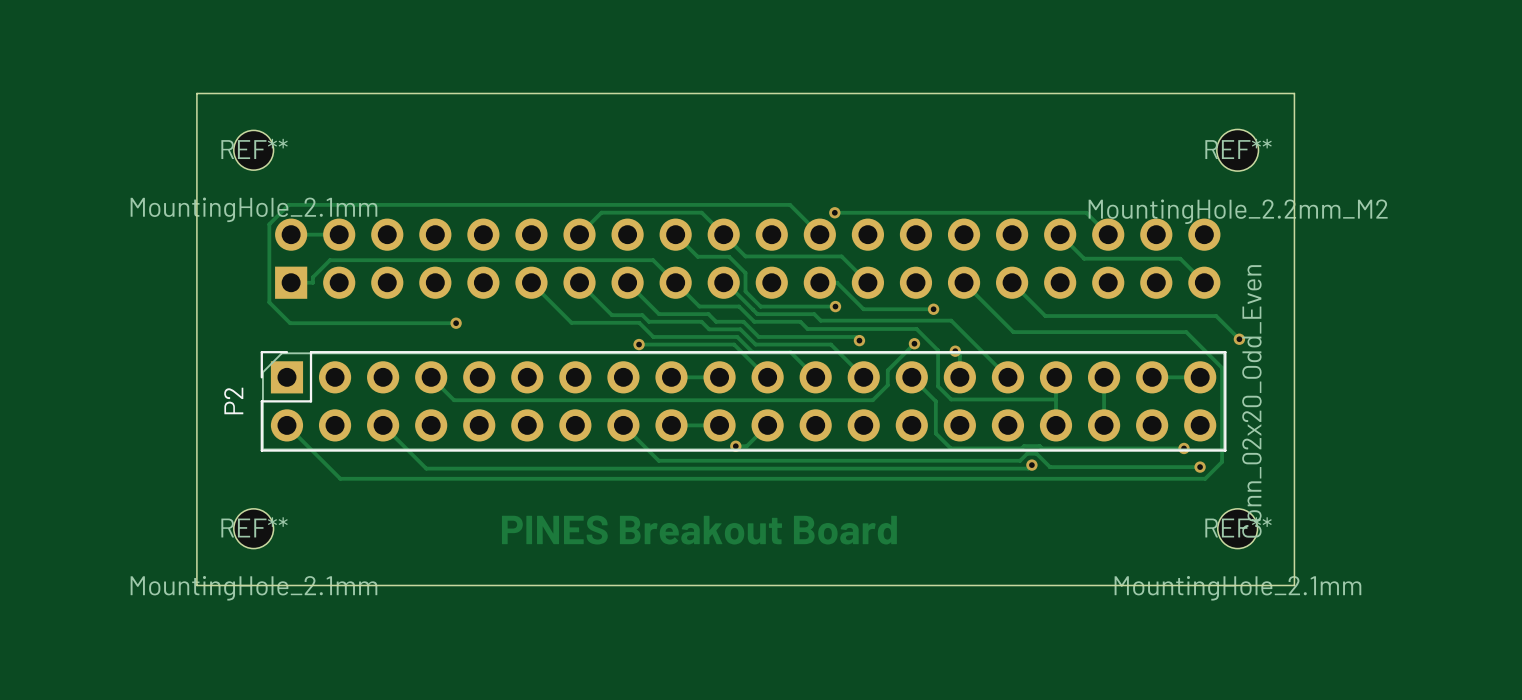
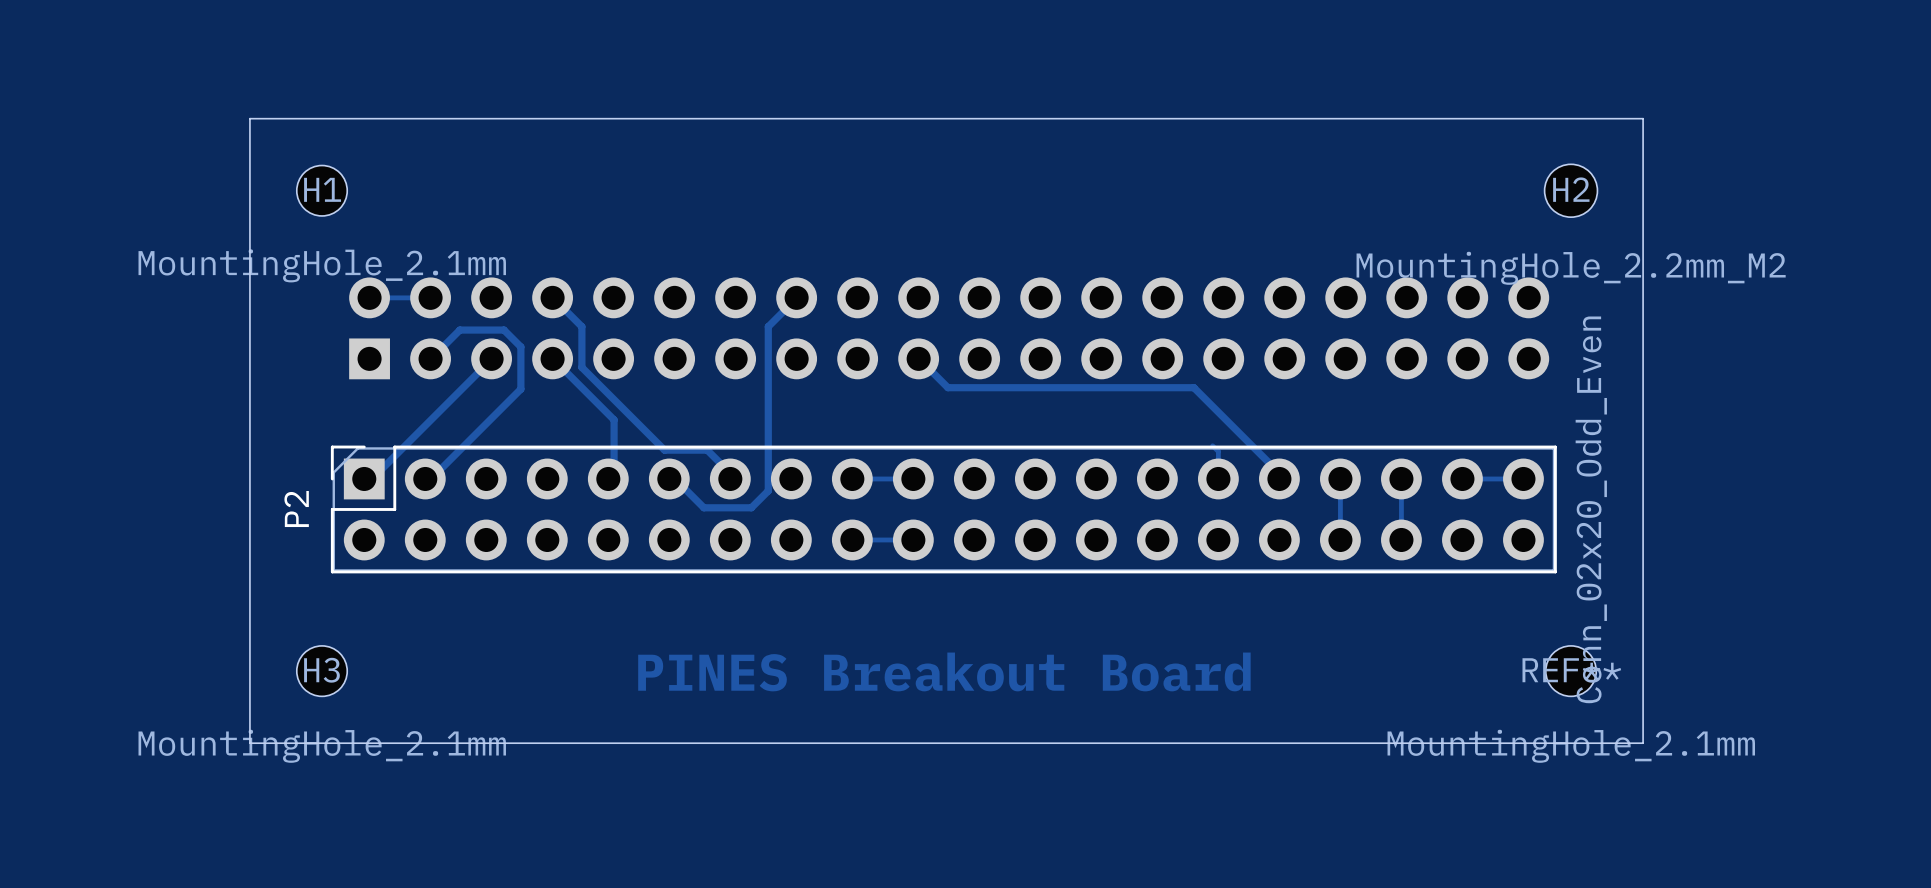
REF** name: REF** (254, 148) -> H1 (322, 189)
REF** name: REF** (1238, 148) -> H2 (1571, 189)
track: (834, 212) (1086, 212) (1108, 234) -> none
via: (834, 212) -> none
track: none -> (553, 297) (581, 326) (581, 367) (664, 450) (707, 450) (736, 478)
track: (579, 234) (601, 212) (701, 212) (745, 256) (841, 256) (867, 282) -> none
track: none -> (797, 297) (768, 326) (768, 490) (751, 507) (703, 507) (675, 478)
track: (675, 234) (697, 256) (729, 256) (745, 273) (745, 291) (760, 306) (835, 306) -> none
track: (819, 234) (790, 204) (288, 204) (269, 224) (269, 302) (290, 323) (456, 323) -> none
track: (1060, 234) (1084, 258) (1180, 258) (1204, 282) -> none
track: (291, 282) (312, 282) (312, 277) (330, 260) (653, 260) (699, 306) (739, 306) (754, 321) (800, 321) (807, 328) (916, 328) (938, 350) (938, 386) (951, 399) (1056, 399) -> none
track: none -> (431, 358) (459, 330) (504, 330) (520, 346) (520, 389) (431, 478)
track: none -> (492, 358) (370, 478)
track: none -> (553, 358) (614, 419) (614, 478)
track: (531, 282) (571, 322) (639, 322) (653, 336) (737, 336) (752, 352) (790, 352) (815, 377) -> none
track: (579, 282) (611, 315) (642, 315) (648, 321) (701, 321) (709, 329) (740, 329) (755, 344) (830, 344) (863, 377) -> none
track: (627, 282) (658, 314) (708, 314) (716, 321) (743, 321) (758, 336) (855, 336) (859, 340) -> none
track: (723, 282) (726, 282) (757, 314) (814, 314) (820, 320) (951, 320) (1007, 377) -> (919, 358) (947, 387) (1193, 387) (1285, 478)
track: (819, 282) (837, 282) (863, 309) (933, 309) -> none
track: (964, 282) (1013, 332) (1186, 332) (1222, 367) (1222, 461) (1205, 478) (340, 478) (286, 425) -> none
track: (1012, 282) (1045, 316) (1216, 316) (1239, 339) -> none
via: (835, 306) -> none
via: (933, 309) -> none
via: (456, 323) -> none
via: (1239, 339) -> none
via: (859, 340) -> none
track: (914, 343) (887, 370) (887, 385) (872, 400) (454, 400) (431, 377) -> none
via: (914, 343) -> none
track: (639, 344) (734, 344) (767, 377) -> none
via: (639, 344) -> none
via: (955, 351) -> none
track: (911, 377) (935, 401) (935, 433) (950, 448) (1021, 448) (1024, 446) (1039, 446) (1042, 448) (1184, 448) -> none
track: (383, 425) (426, 468) (1028, 468) (1031, 465) -> none
track: (623, 425) (658, 460) (1020, 460) (1027, 453) (1036, 453) (1049, 467) (1200, 467) -> none
track: (767, 425) (746, 446) (735, 446) -> none
via: (735, 446) -> none
via: (1184, 448) -> none
via: (1031, 465) -> none
via: (1200, 467) -> none
REF** name: REF** (254, 527) -> H3 (321, 670)

